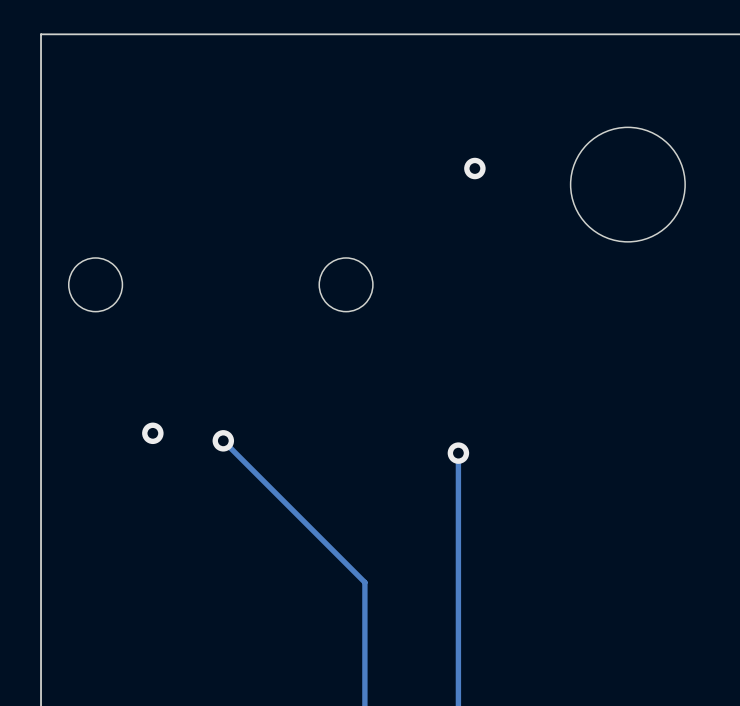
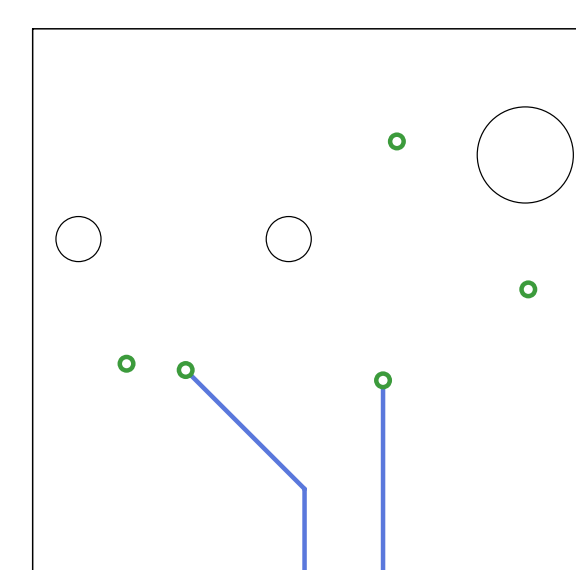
via: none -> (528, 289)

